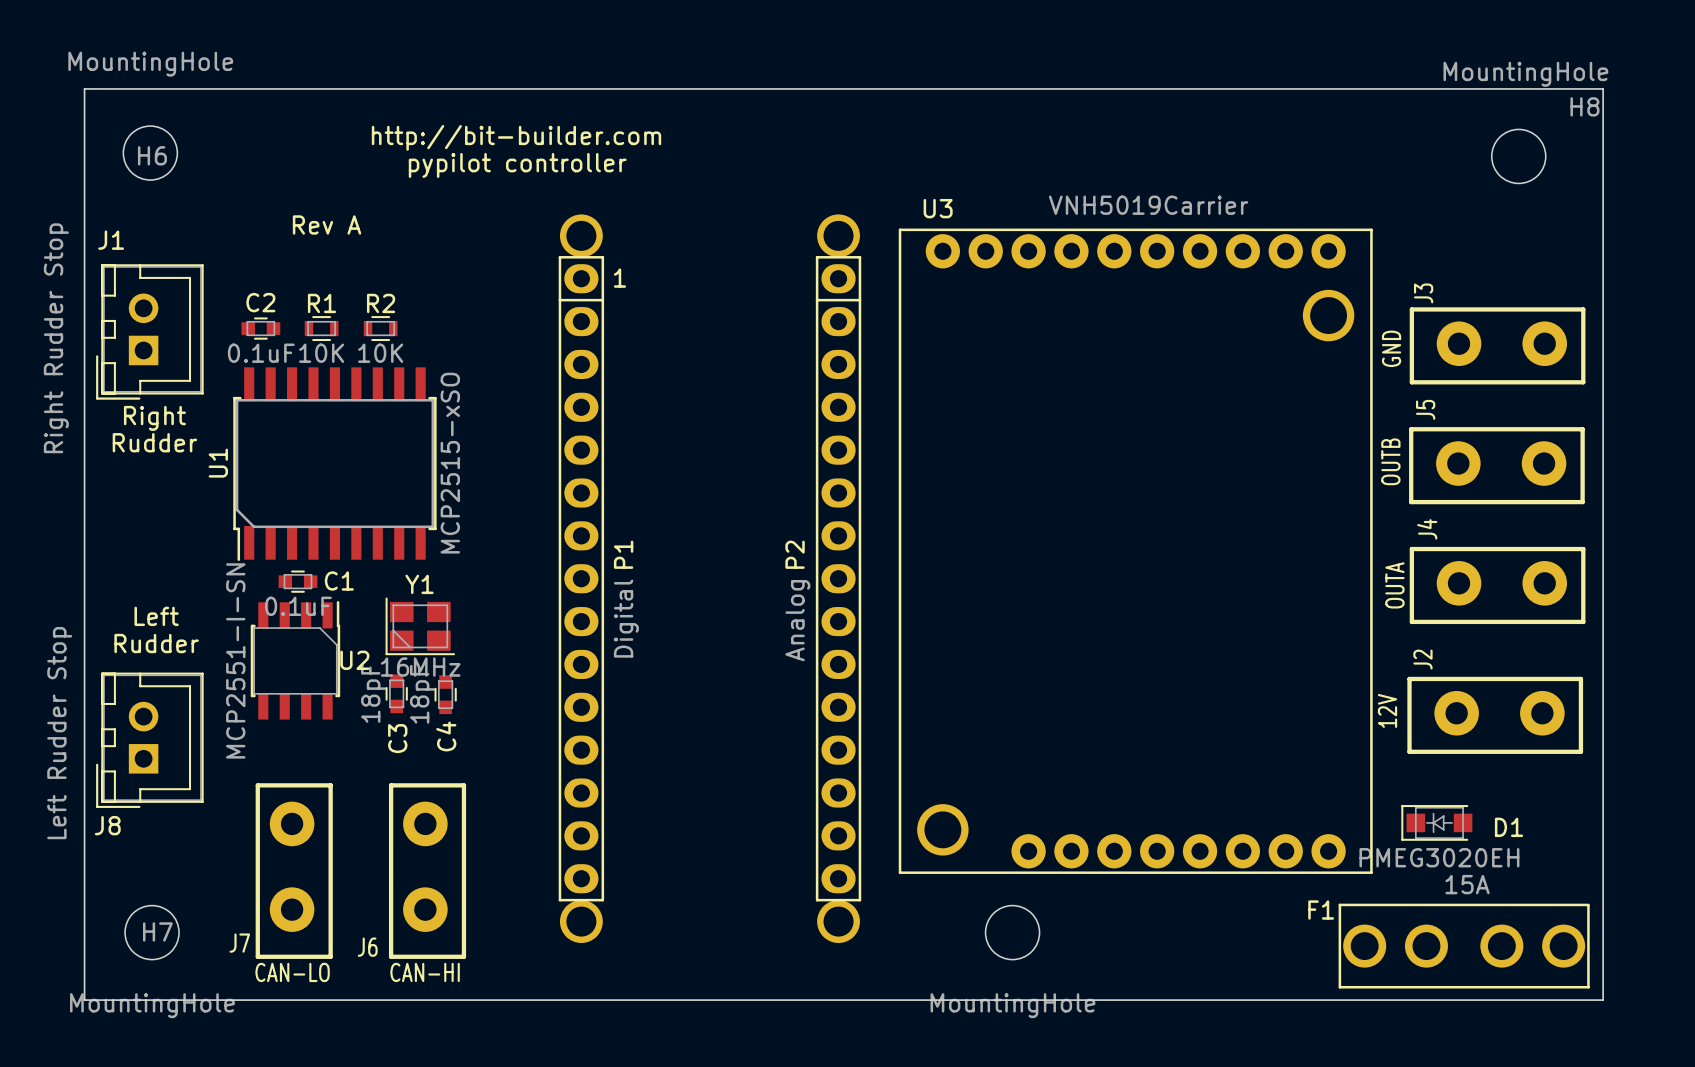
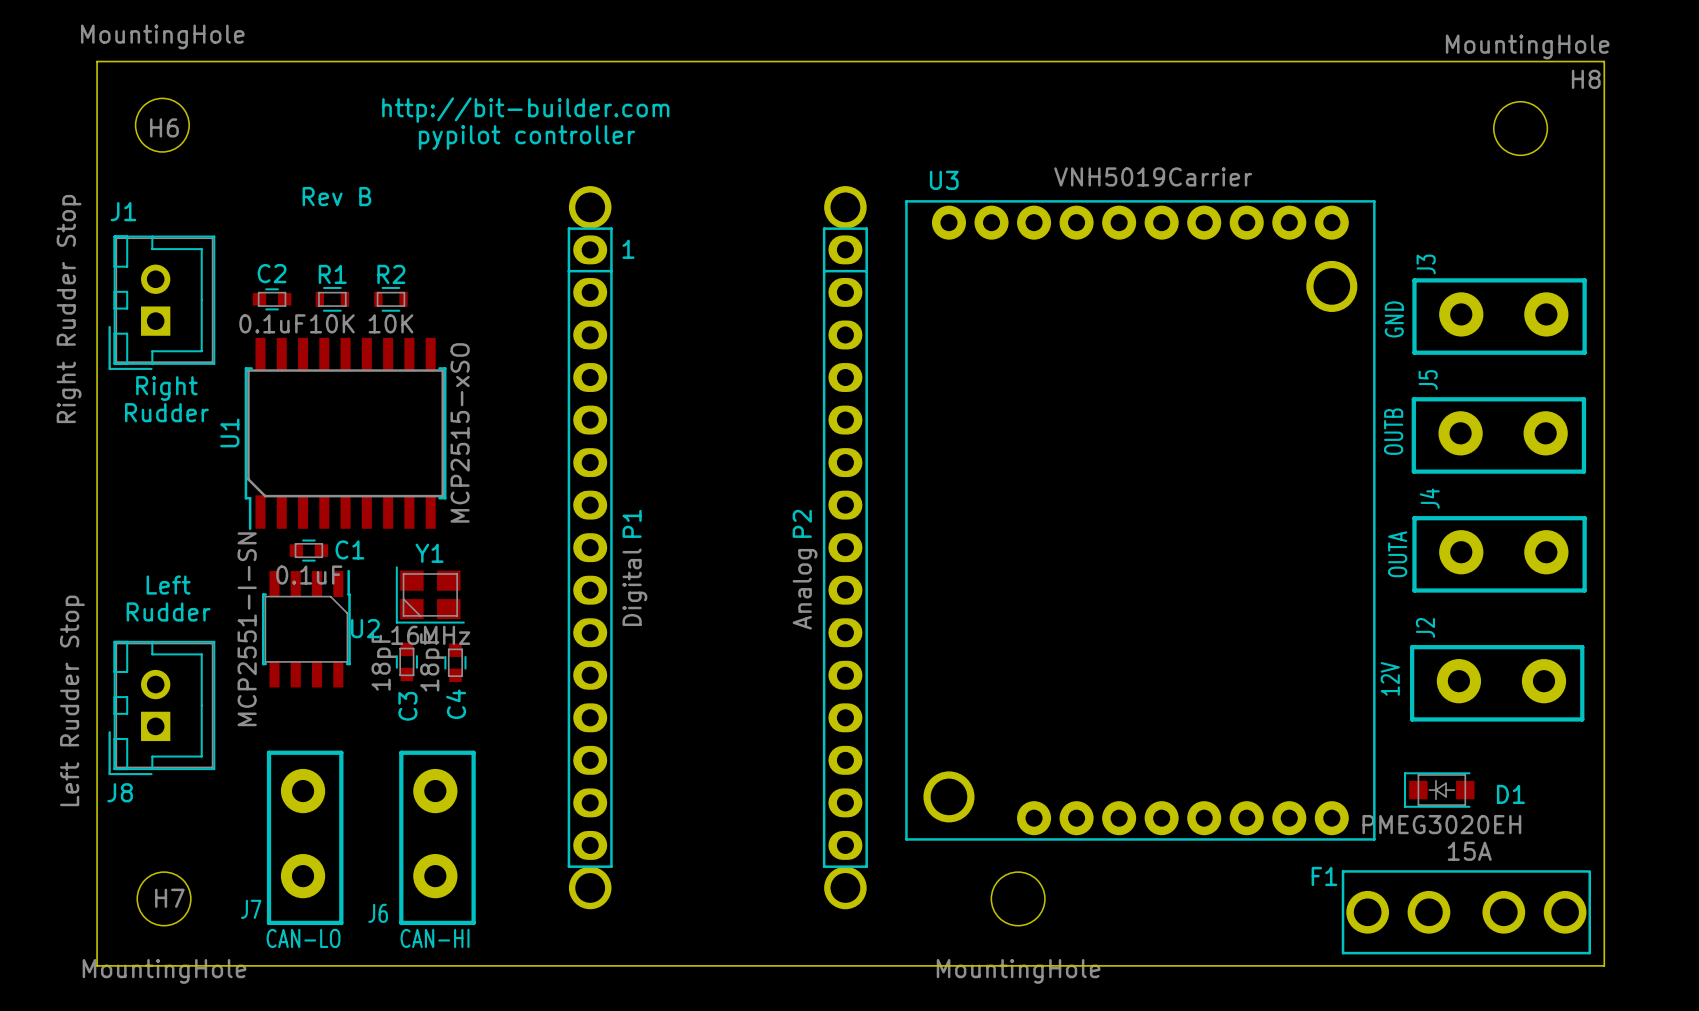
text: Rev A (327, 224) -> Rev B (336, 196)

